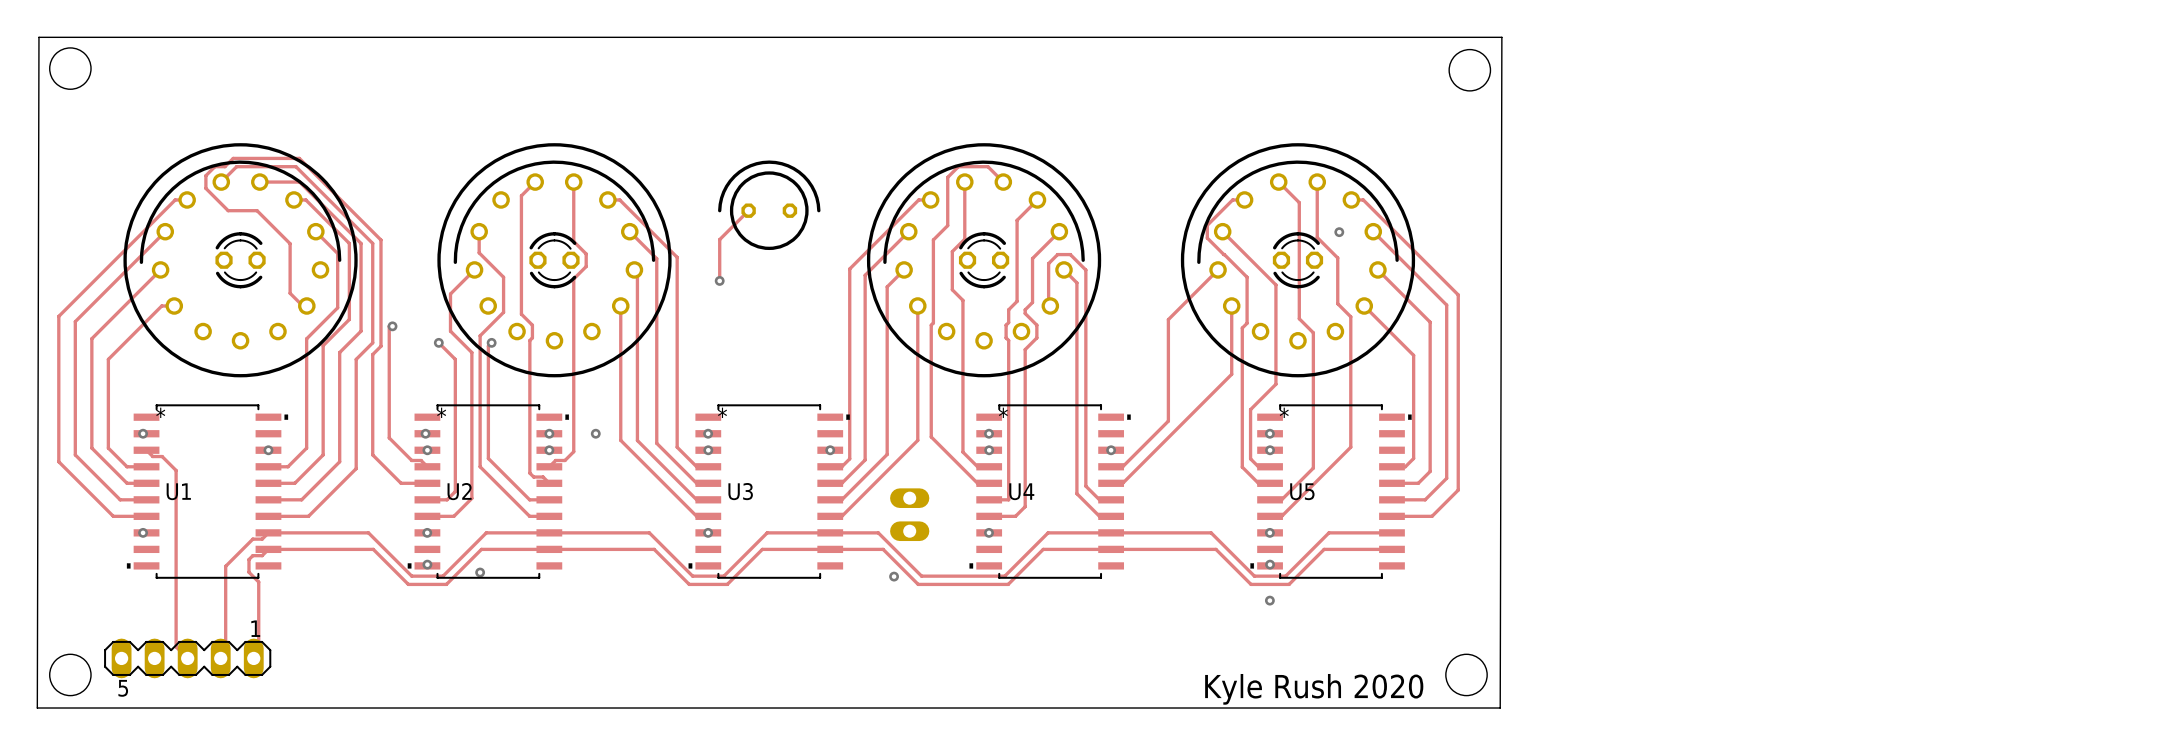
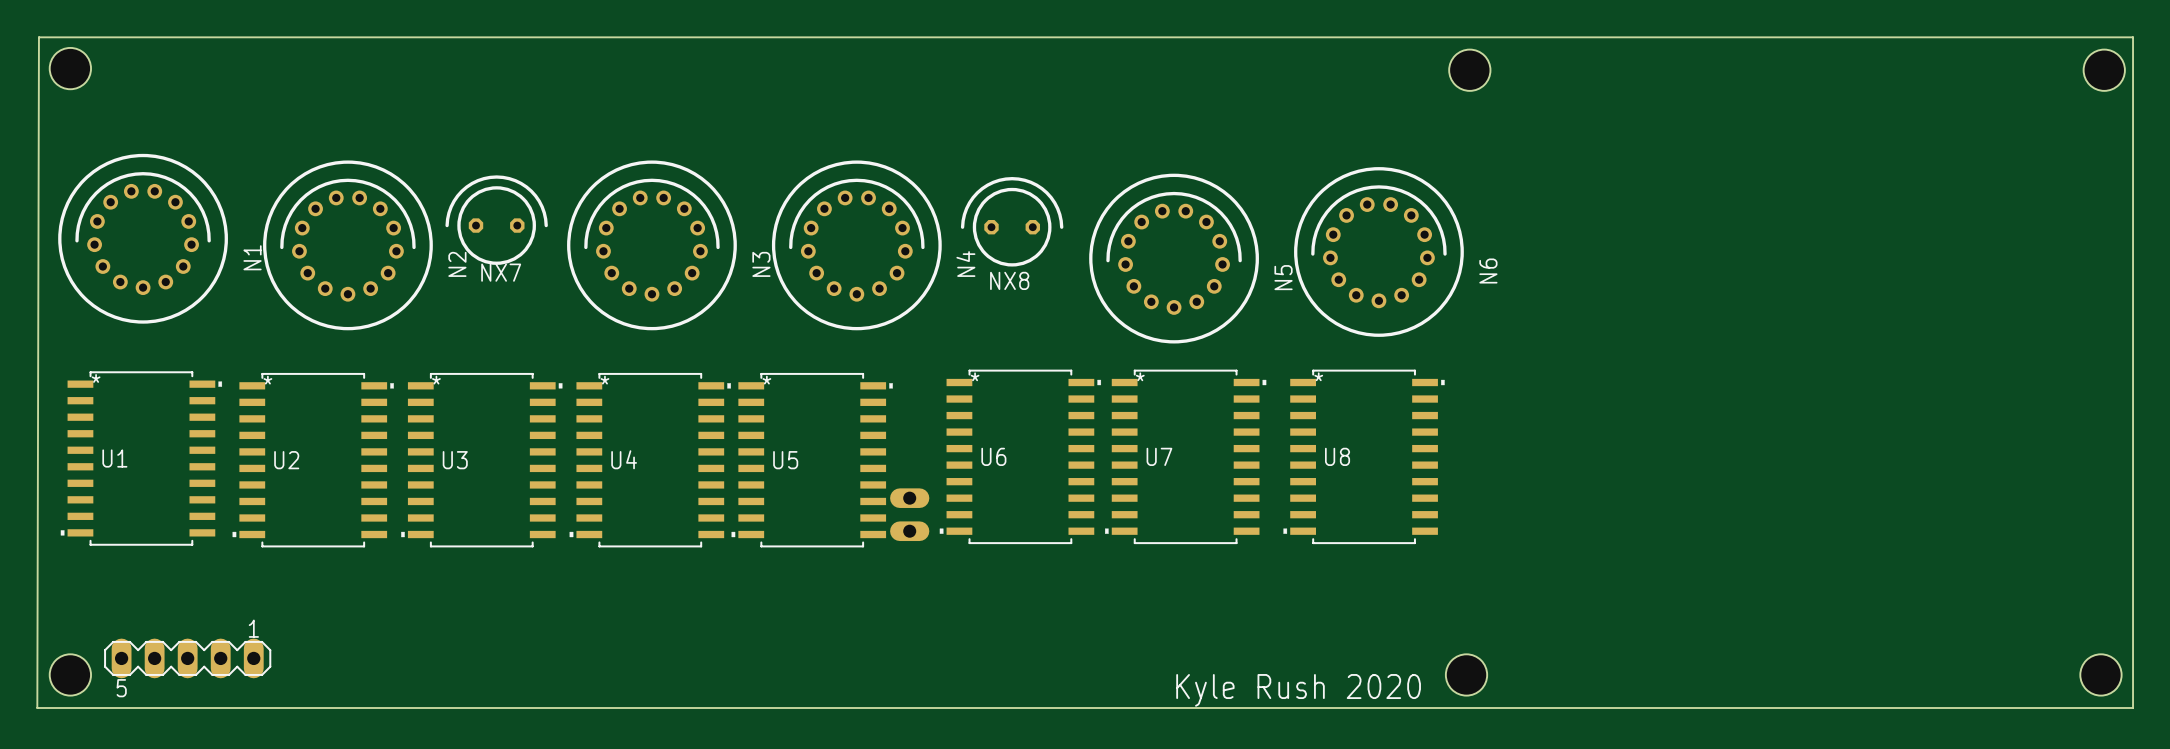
board edge: (1501, 37) (1500, 708) -> (1501, 37) (2133, 37) (2133, 708) (1500, 708)
hole: none -> (2104, 70)
track: (221, 182) (236, 166) (295, 166) (372, 243) (372, 342) (356, 359) (356, 468) (308, 516) (268, 516) -> none
track: (259, 182) (299, 182) (361, 243) (361, 331) (339, 352) (339, 461) (301, 499) (268, 499) -> none
track: (535, 182) (521, 195) (521, 314) (532, 325) (532, 337) (529, 340) (529, 473) (533, 477) (543, 477) (549, 483) -> none
track: (573, 182) (573, 241) (586, 253) (586, 266) (573, 278) (573, 451) (564, 460) (555, 460) (549, 466) -> none
track: (964, 182) (964, 239) (952, 251) (952, 289) (962, 300) (962, 452) (977, 466) (989, 466) -> none
track: (1003, 182) (987, 166) (958, 166) (947, 177) (947, 225) (933, 239) (931, 436) (977, 483) (989, 483) -> none
track: (1278, 182) (1299, 202) (1299, 318) (1313, 332) (1313, 468) (1281, 499) (1270, 499) -> none
track: (1317, 182) (1317, 237) (1337, 257) (1337, 303) (1350, 316) (1350, 447) (1281, 516) (1270, 516) -> none
track: (187, 199) (175, 199) (58, 316) (58, 461) (113, 516) (146, 516) -> none
track: (293, 199) (305, 199) (349, 243) (349, 319) (323, 345) (323, 454) (294, 483) (268, 483) -> none
track: (607, 199) (619, 199) (677, 257) (677, 447) (696, 466) (708, 466) -> none
track: (930, 199) (918, 199) (849, 268) (849, 458) (841, 466) (830, 466) -> none
track: (1037, 199) (1017, 220) (1017, 301) (1008, 309) (1008, 322) (1006, 325) (1006, 337) (1008, 340) (1008, 499) (989, 499) -> none
track: (1244, 199) (1232, 199) (1207, 225) (1207, 238) (1247, 277) (1247, 323) (1242, 328) (1242, 467) (1258, 483) (1270, 483) -> none
track: (1351, 199) (1363, 199) (1458, 294) (1458, 490) (1432, 516) (1391, 516) -> none
part: (769, 205) -> none
track: (748, 210) (719, 239) (719, 280) -> none
NX7: none -> (496, 220)
NX8: none -> (1012, 221)
track: (165, 231) (75, 321) (75, 454) (120, 499) (146, 499) -> none
track: (315, 231) (337, 253) (337, 307) (306, 338) (306, 448) (287, 466) (268, 466) -> none
track: (479, 231) (479, 252) (503, 277) (503, 312) (480, 335) (480, 466) (529, 516) (549, 516) -> none
track: (629, 231) (656, 258) (656, 443) (696, 483) (708, 483) -> none
track: (908, 231) (865, 275) (865, 459) (841, 483) (830, 483) -> none
track: (1059, 231) (1032, 258) (1032, 302) (1025, 309) (1025, 313) (1036, 325) (1036, 337) (1025, 349) (1025, 506) (1015, 516) (989, 516) -> none
track: (1222, 231) (1275, 284) (1275, 384) (1250, 409) (1250, 458) (1258, 466) (1270, 466) -> none
track: (1373, 231) (1446, 305) (1446, 478) (1425, 499) (1391, 499) -> none
via: (1339, 232) -> none
N1: none -> (143, 238)
N2: none -> (347, 245)
N3: none -> (651, 245)
N4: none -> (856, 245)
N6: none -> (1378, 251)
N5: none -> (1174, 258)
part: (240, 260) -> none
part: (240, 260) -> none
part: (554, 260) -> none
part: (554, 260) -> none
part: (984, 260) -> none
part: (984, 260) -> none
part: (1297, 260) -> none
part: (1297, 260) -> none
track: (160, 269) (91, 338) (91, 448) (127, 483) (146, 483) -> none
track: (474, 269) (450, 293) (450, 331) (471, 352) (471, 498) (453, 516) (427, 516) -> none
track: (634, 269) (637, 272) (637, 440) (696, 499) (708, 499) -> none
track: (904, 269) (887, 286) (887, 454) (841, 499) (830, 499) -> none
track: (1064, 269) (1076, 282) (1076, 493) (1099, 516) (1111, 516) -> none
track: (1218, 269) (1168, 319) (1168, 421) (1122, 466) (1111, 466) -> none
track: (1377, 269) (1430, 322) (1430, 471) (1418, 483) (1391, 483) -> none
via: (719, 280) -> none
track: (174, 305) (161, 305) (108, 359) (108, 448) (127, 466) (146, 466) -> none
track: (306, 305) (302, 305) (290, 293) (290, 243) (257, 210) (228, 210) (205, 188) (205, 175) (214, 166) (224, 166) (233, 158) (299, 158) (380, 240) (380, 346) (372, 354) (372, 454) (401, 483) (427, 483) -> none
track: (620, 305) (620, 440) (696, 516) (708, 516) -> none
track: (917, 305) (917, 440) (841, 516) (830, 516) -> none
track: (1050, 305) (1048, 304) (1048, 263) (1057, 254) (1070, 254) (1085, 270) (1085, 486) (1099, 499) (1111, 499) -> none
track: (1231, 305) (1231, 374) (1122, 483) (1111, 483) -> none
track: (1364, 305) (1413, 355) (1413, 458) (1405, 466) (1391, 466) -> none
track: (392, 326) (389, 326) (389, 437) (411, 460) (421, 460) (427, 466) -> none
via: (392, 326) -> none
track: (438, 342) (455, 359) (455, 491) (447, 499) (427, 499) -> none
via: (438, 342) -> none
track: (491, 342) (488, 346) (488, 458) (529, 499) (549, 499) -> none
via: (491, 342) -> none
via: (143, 433) -> none
via: (425, 433) -> none
via: (549, 433) -> none
via: (595, 433) -> none
via: (708, 433) -> none
via: (989, 433) -> none
via: (1269, 433) -> none
track: (146, 450) (152, 456) (162, 456) (176, 470) (176, 646) (187, 658) -> none
via: (268, 450) -> none
via: (427, 450) -> none
via: (549, 450) -> none
via: (708, 450) -> none
via: (830, 450) -> none
via: (989, 450) -> none
via: (1111, 450) -> none
via: (1270, 450) -> none
U6: none -> (1020, 456)
U7: none -> (1185, 456)
U8: none -> (1364, 456)
U1 position: (207, 491) -> (141, 458)
U2 position: (488, 491) -> (313, 460)
U3 position: (769, 491) -> (481, 460)
U4 position: (1050, 491) -> (650, 460)
U5 position: (1331, 491) -> (812, 460)
via: (143, 532) -> none
via: (427, 532) -> none
via: (708, 532) -> none
via: (989, 532) -> none
via: (1269, 532) -> none
track: (1391, 532) (1328, 532) (1285, 576) (1254, 576) (1211, 532) (1048, 532) (1004, 576) (921, 576) (878, 532) (767, 532) (723, 576) (692, 576) (649, 532) (486, 532) (443, 576) (411, 576) (368, 532) (268, 532) (262, 539) (252, 539) (225, 566) (225, 653) (220, 658) -> none
track: (1391, 549) (1324, 549) (1289, 584) (1251, 584) (1215, 549) (1043, 549) (1008, 584) (918, 584) (883, 549) (762, 549) (727, 584) (689, 584) (654, 549) (481, 549) (446, 584) (408, 584) (373, 549) (268, 549) (262, 555) (252, 555) (248, 559) (248, 572) (258, 582) (258, 653) (253, 658) -> none
via: (427, 564) -> none
via: (1270, 564) -> none
via: (480, 572) -> none
via: (894, 576) -> none
via: (1269, 600) -> none
hole: none -> (2100, 674)

